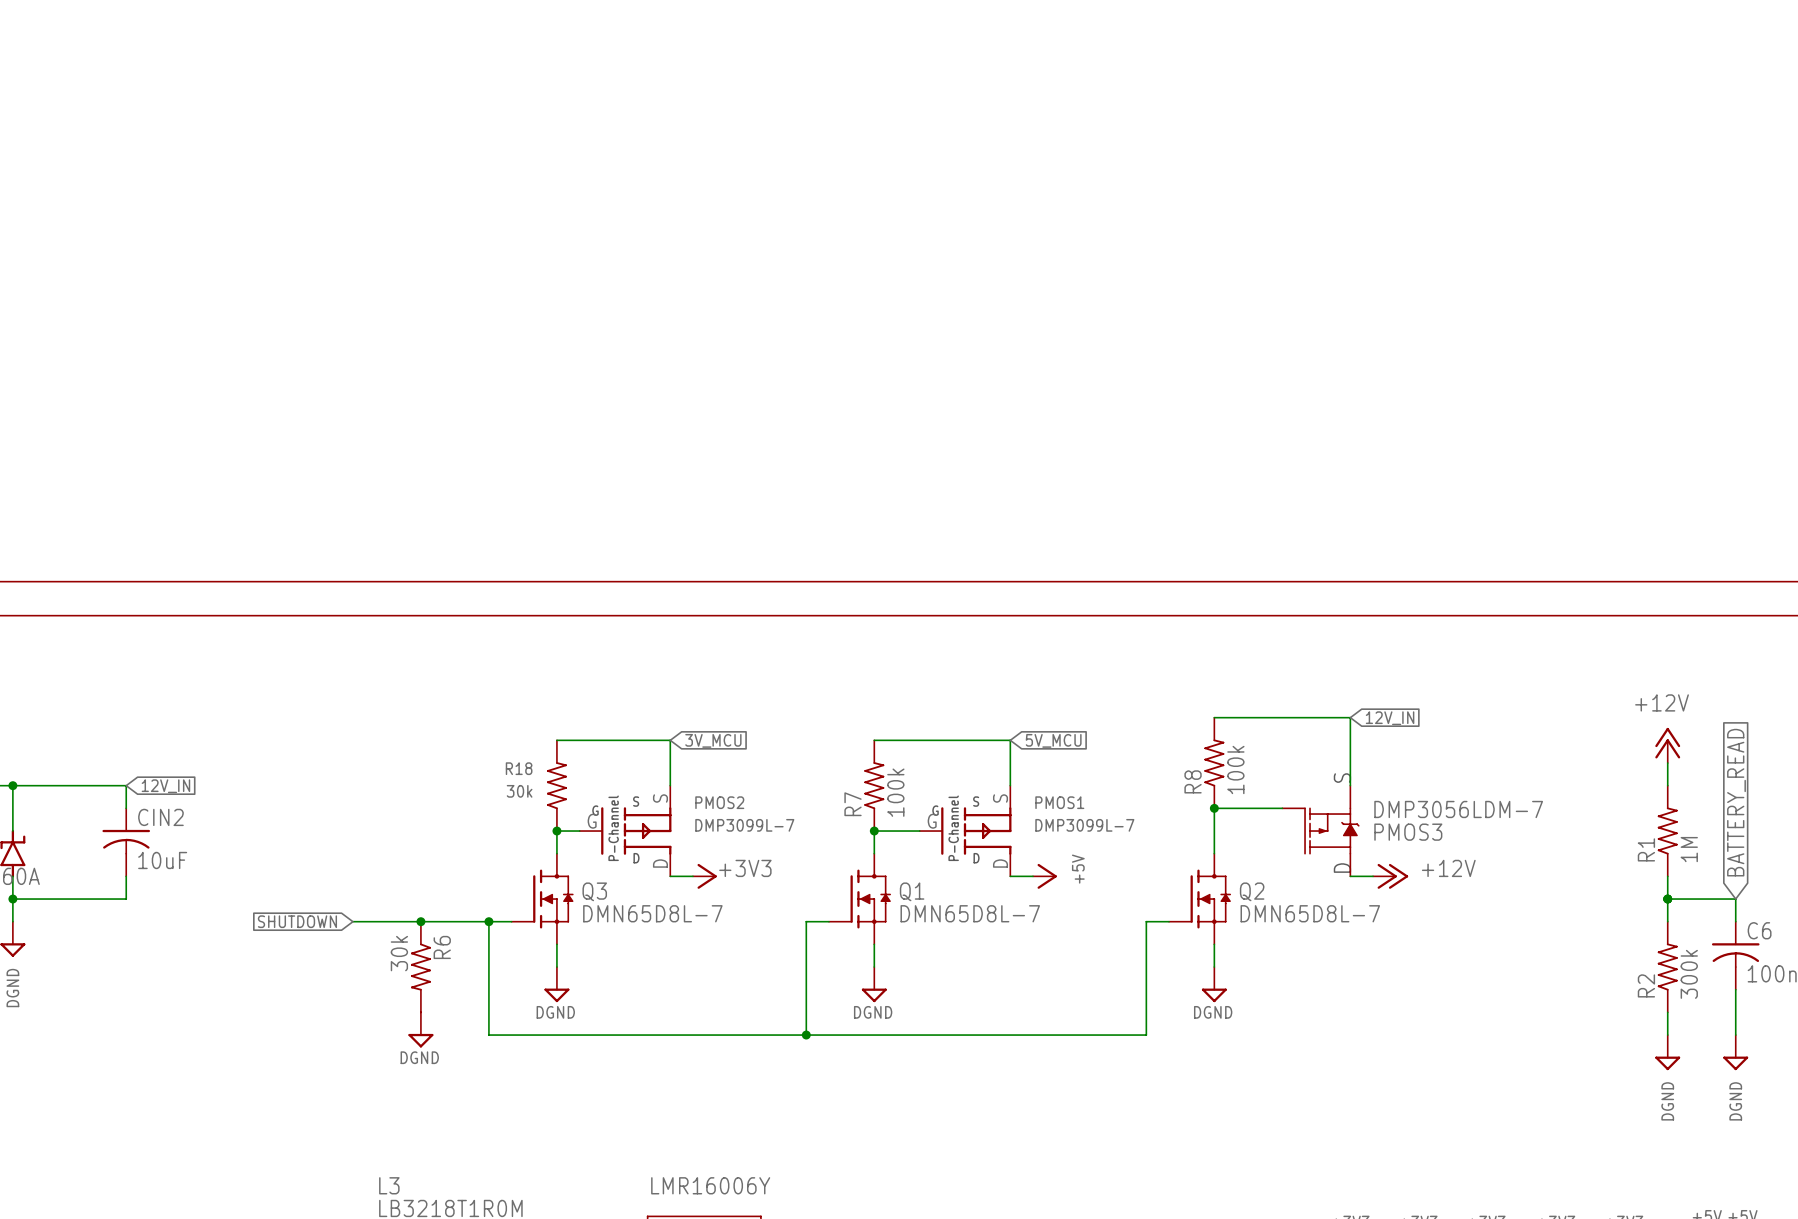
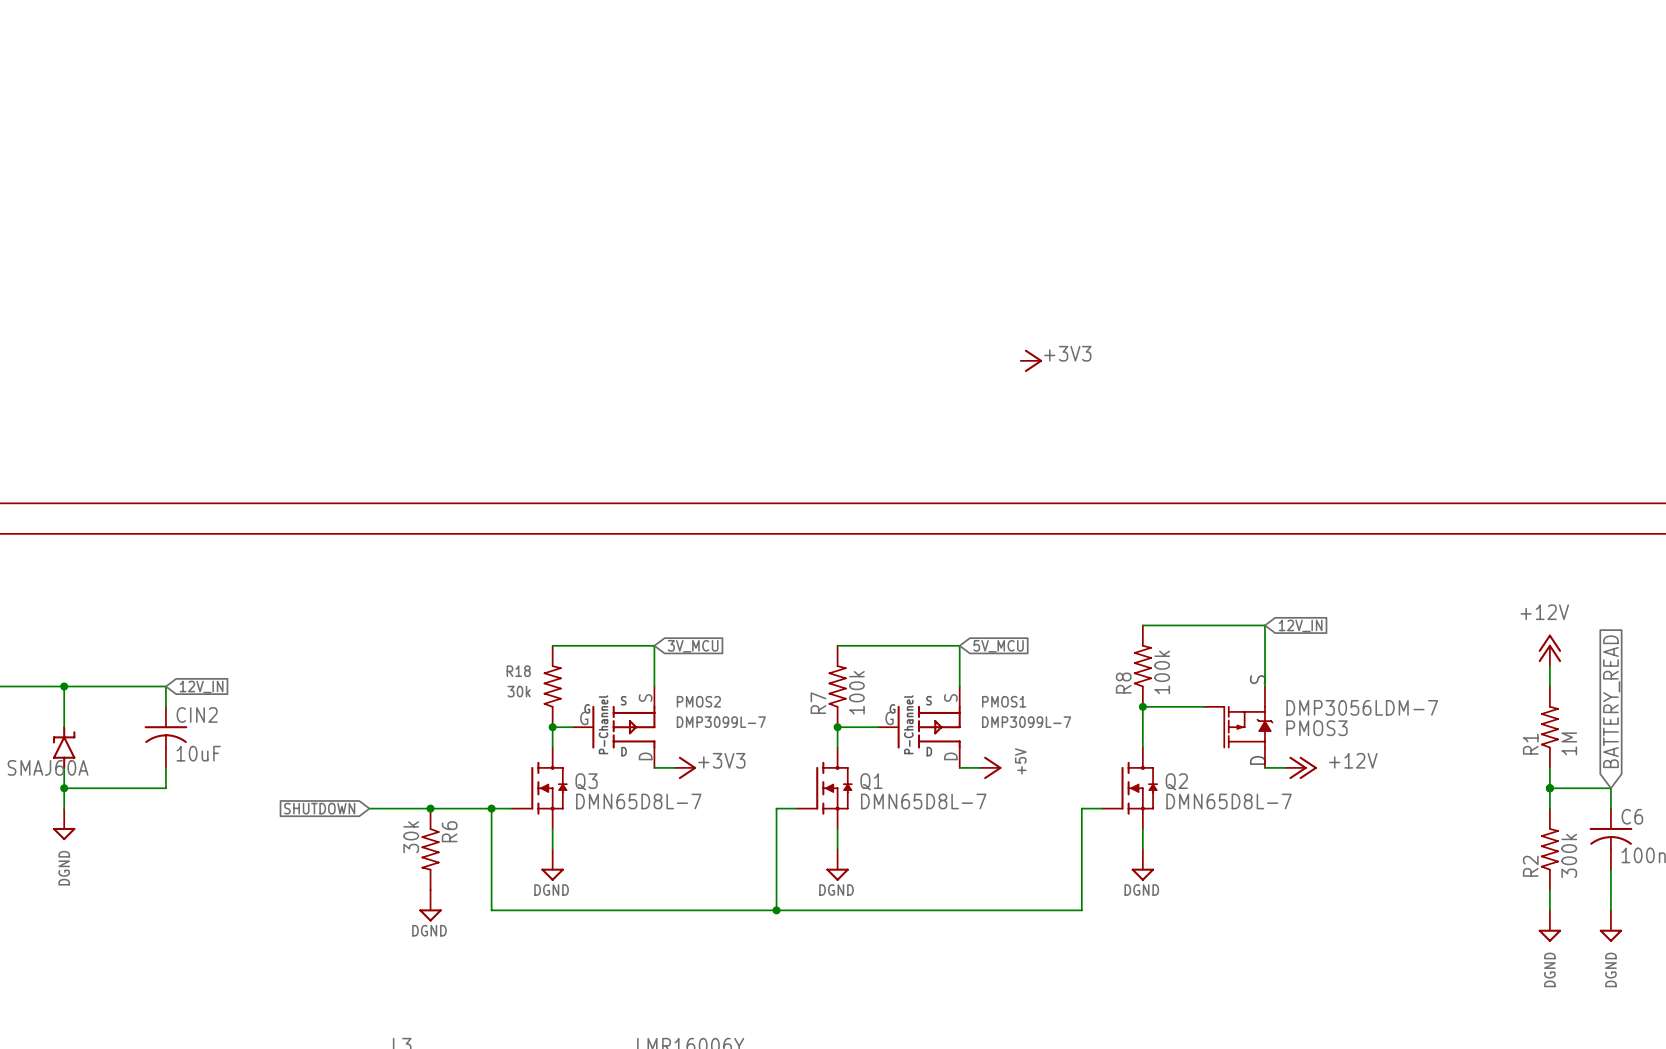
power symbol: none -> +3V3 (1031, 360)

